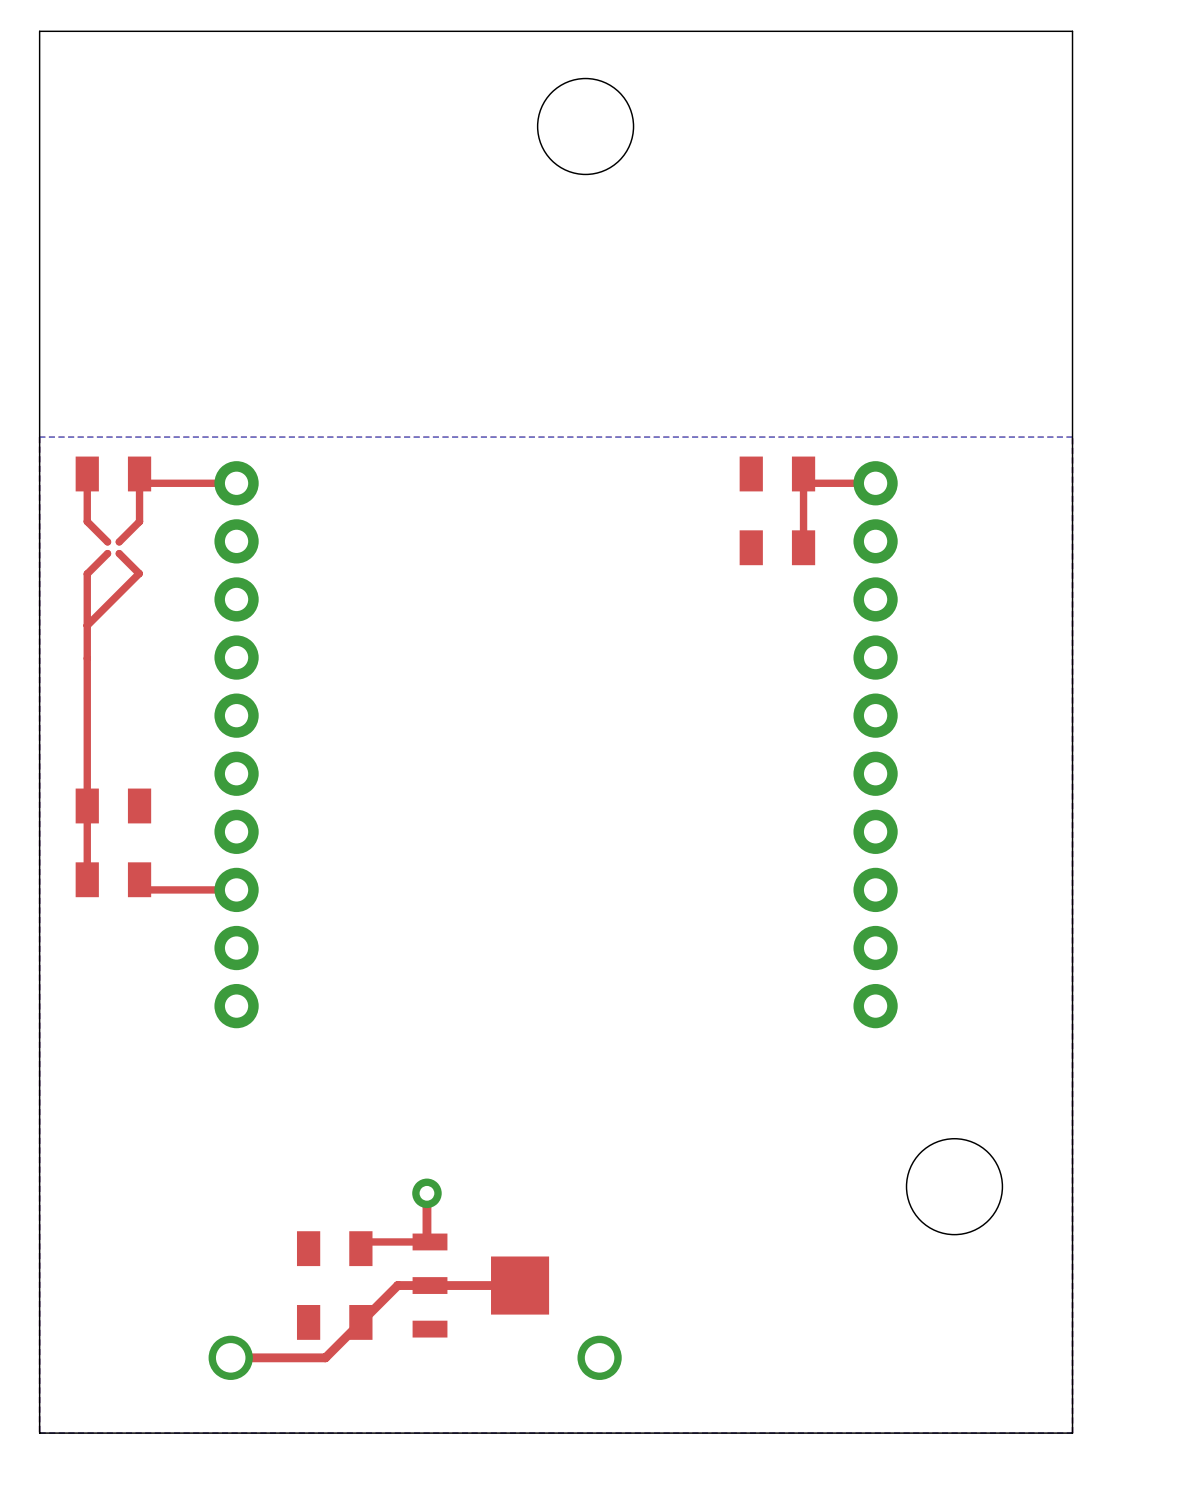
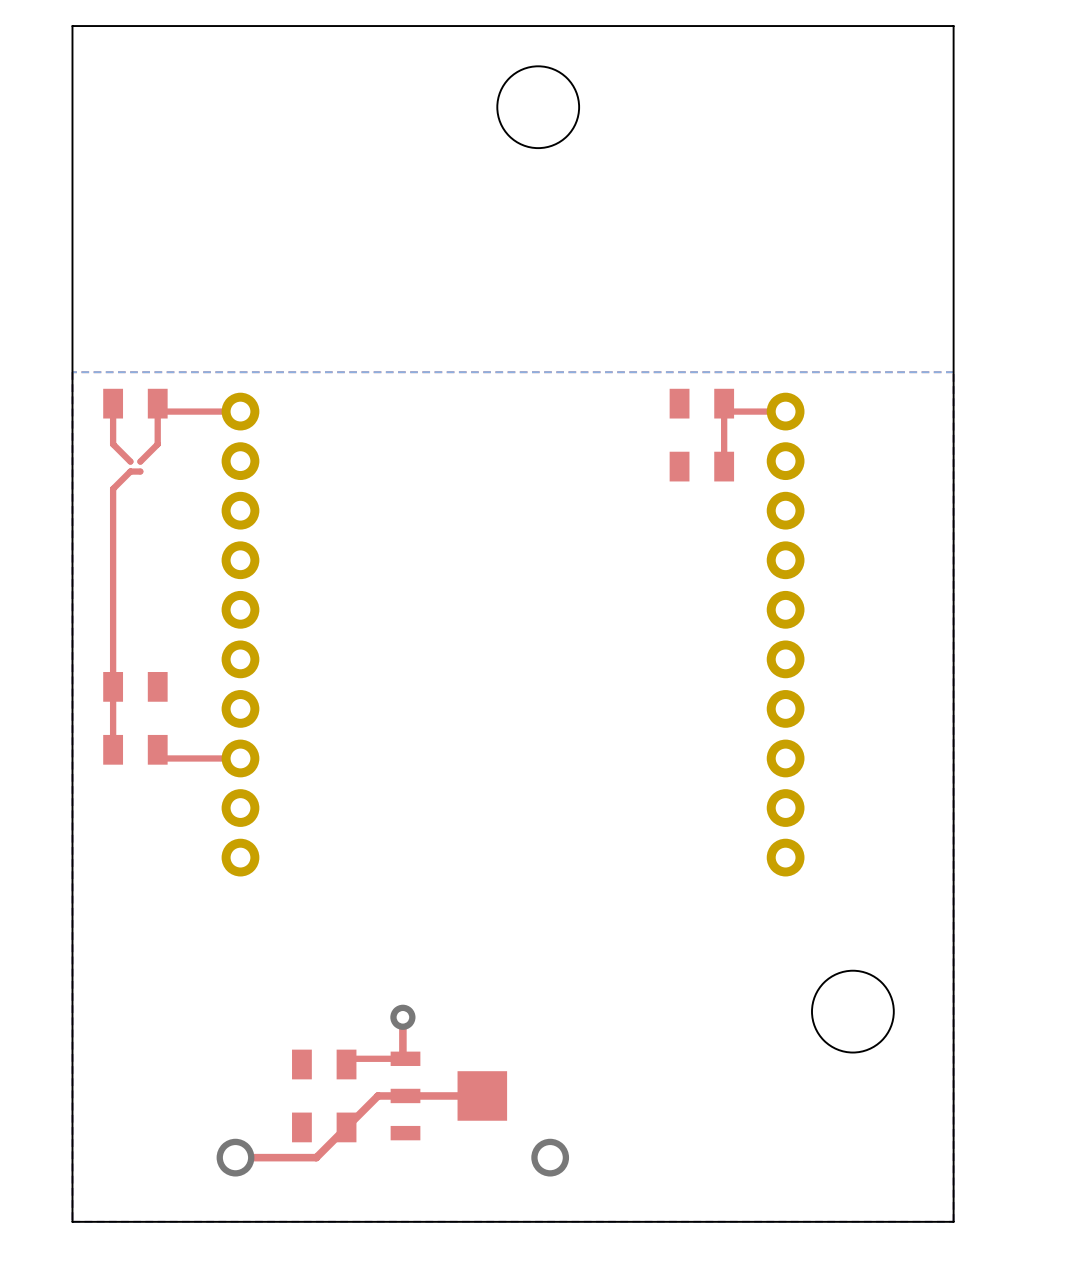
top track: (119, 553) (139, 573) (87, 625) -> (140, 471) (130, 471)

